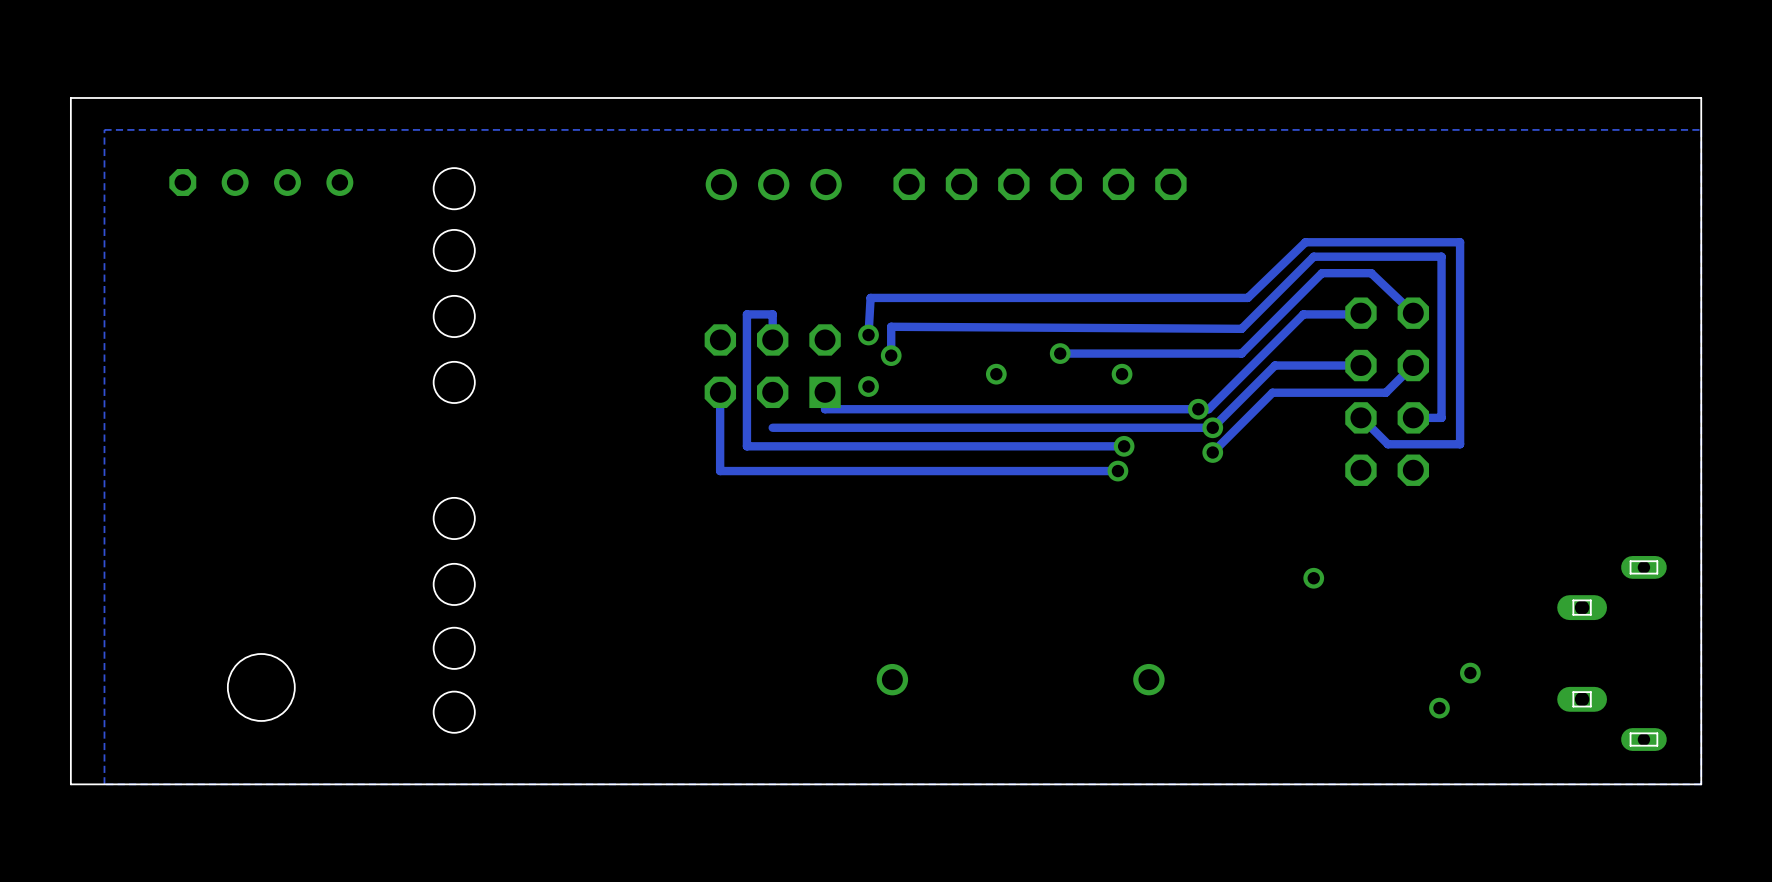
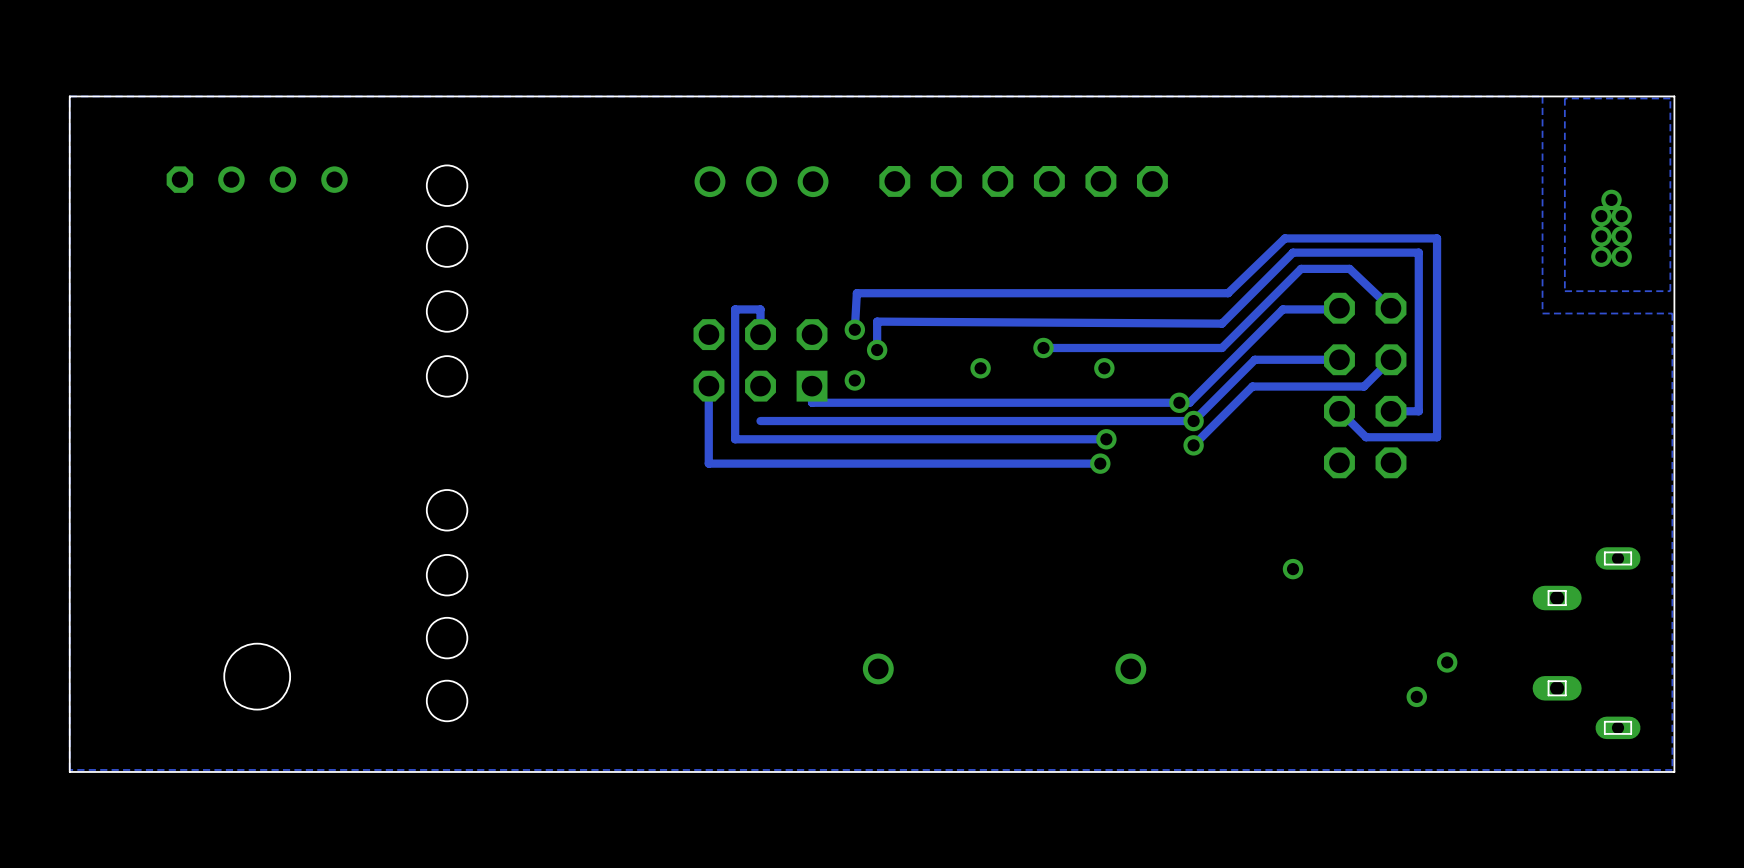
zone outline: none -> (1670, 98) (1670, 291) (1564, 291) (1564, 98) (1670, 98)
zone outline: (1701, 129) (1701, 784) (104, 784) (104, 129) (1701, 129) -> (1542, 96) (1542, 313) (1672, 313) (1672, 769) (69, 769) (69, 96) (1542, 96)
via: none -> (1611, 199)
via: none -> (1601, 216)
via: none -> (1621, 216)
via: none -> (1601, 236)
via: none -> (1621, 236)
via: none -> (1601, 256)
via: none -> (1621, 256)

